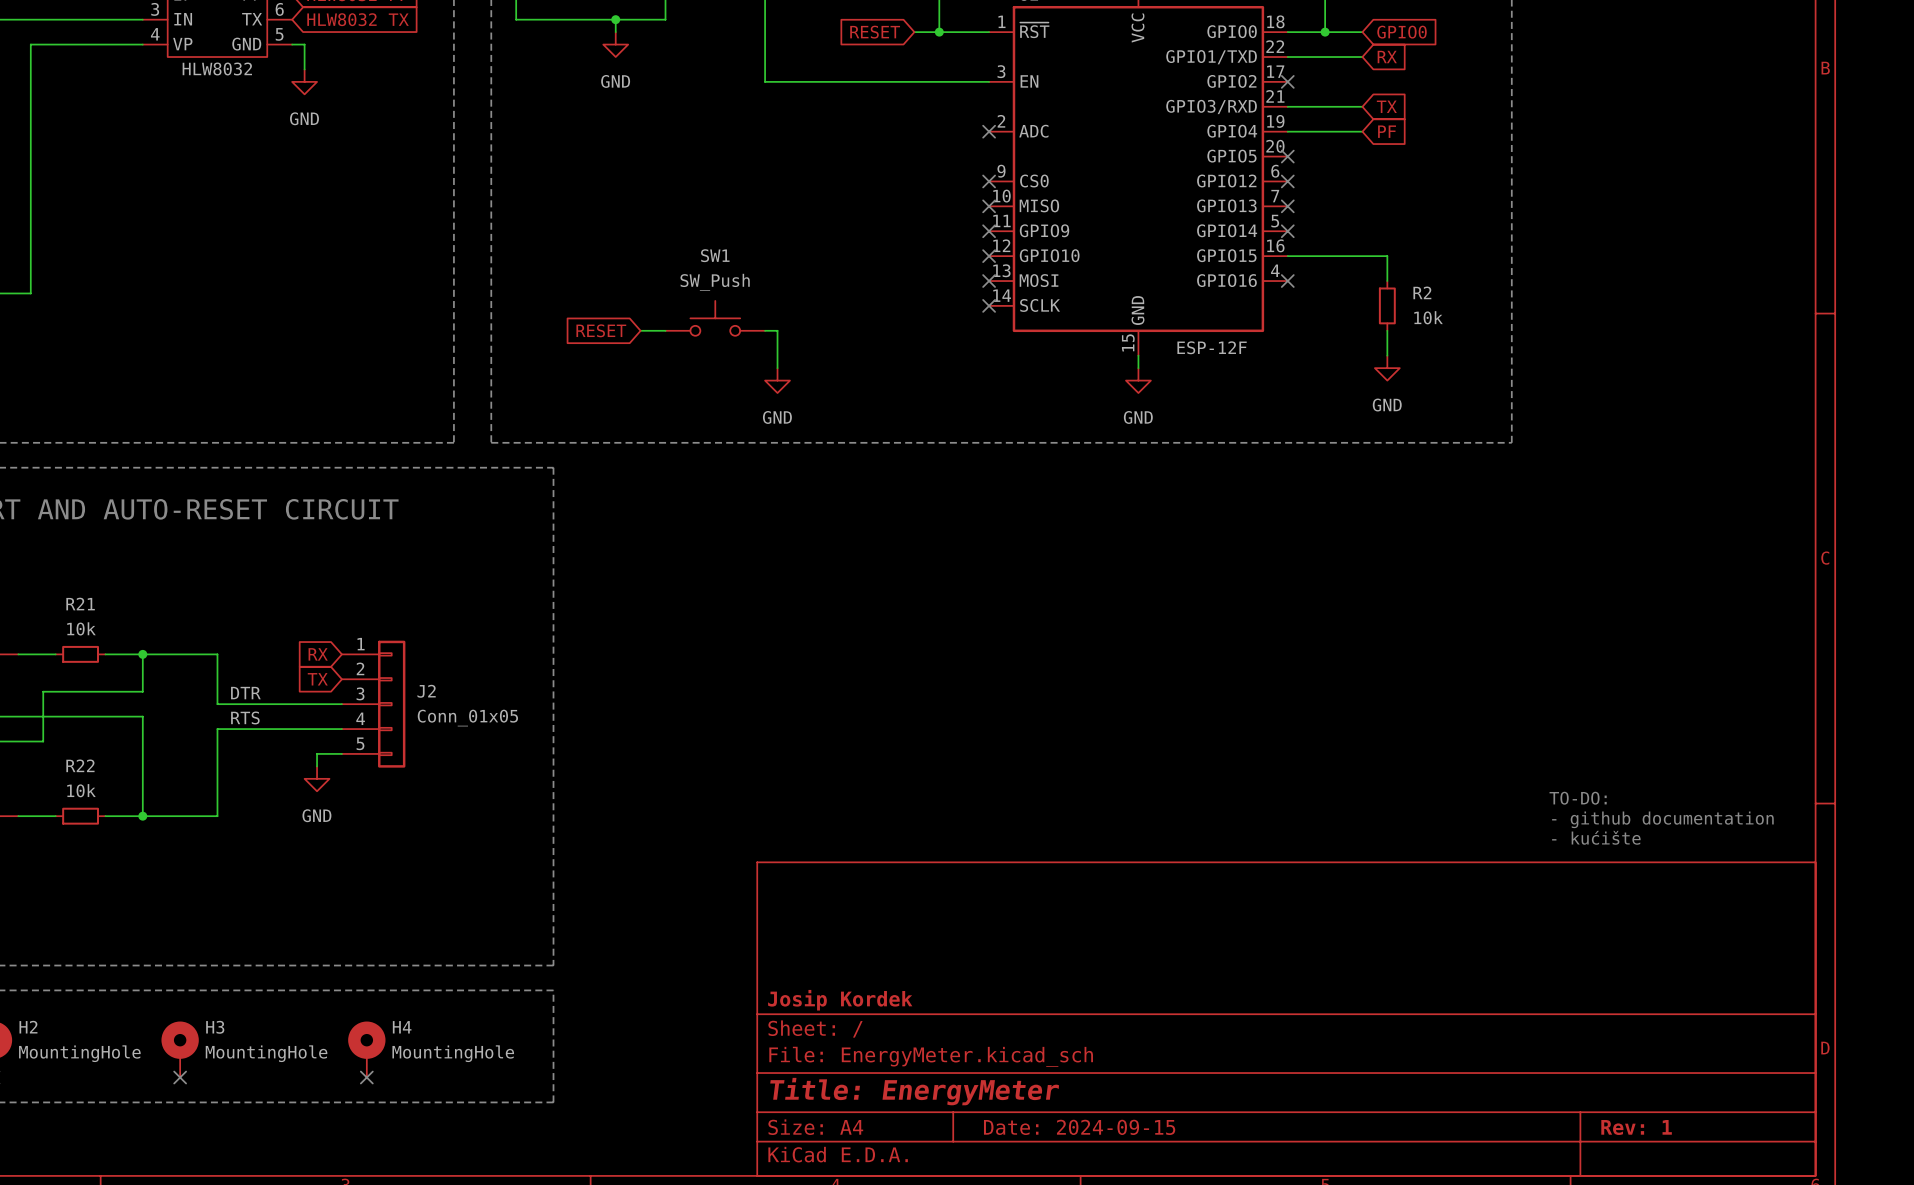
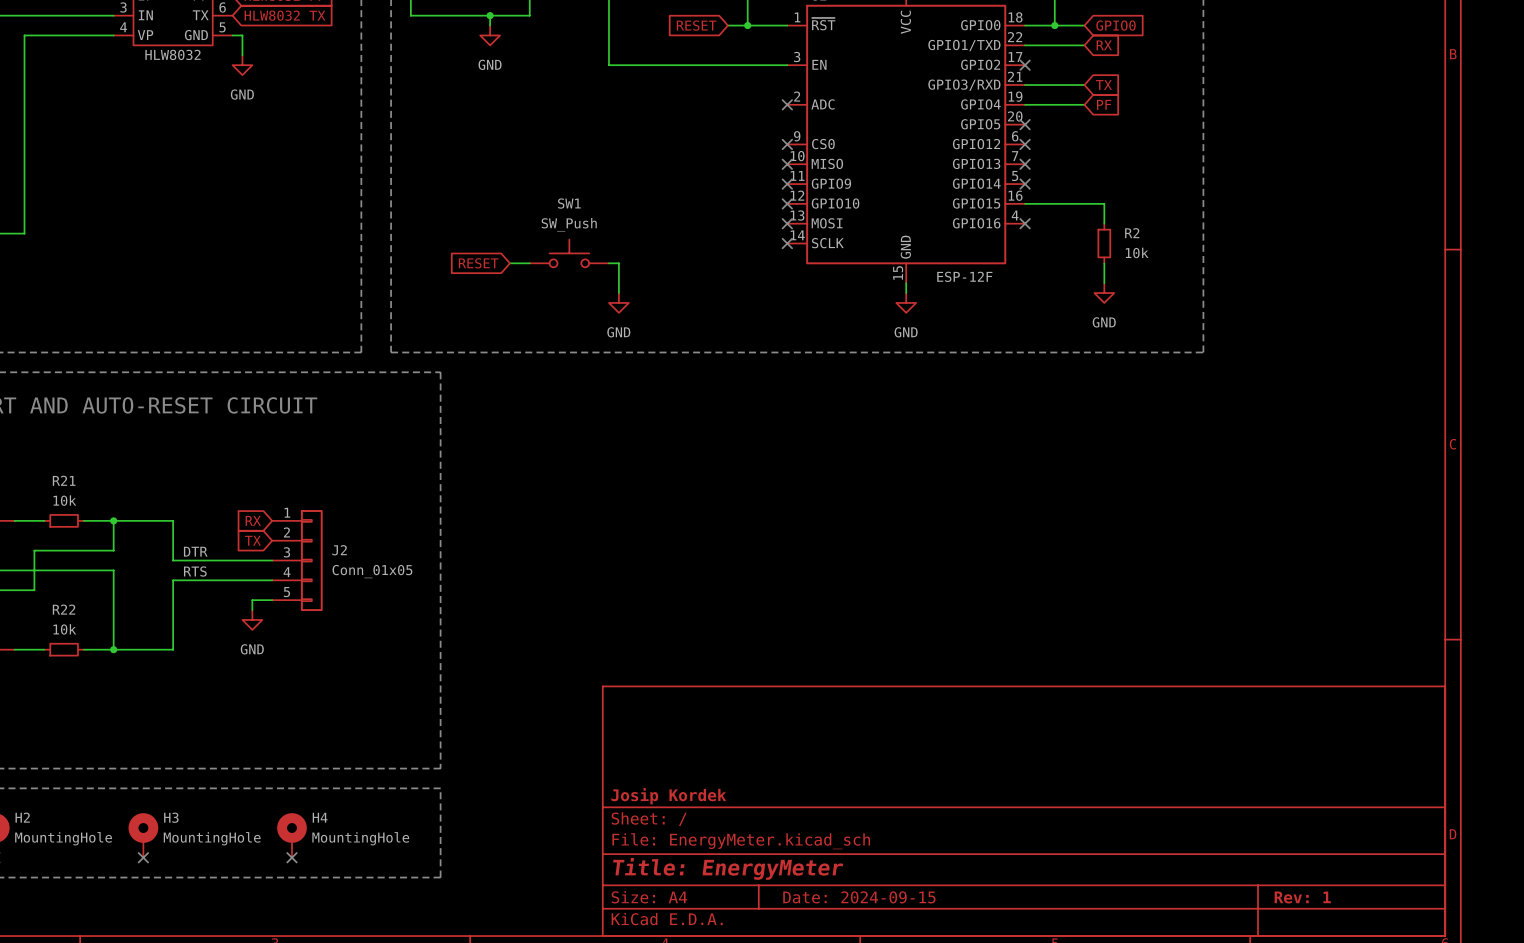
text: TO-DO: (1578, 798) -> none
text: - github documentation (1662, 819) -> none
text: - kućište (1596, 837) -> none

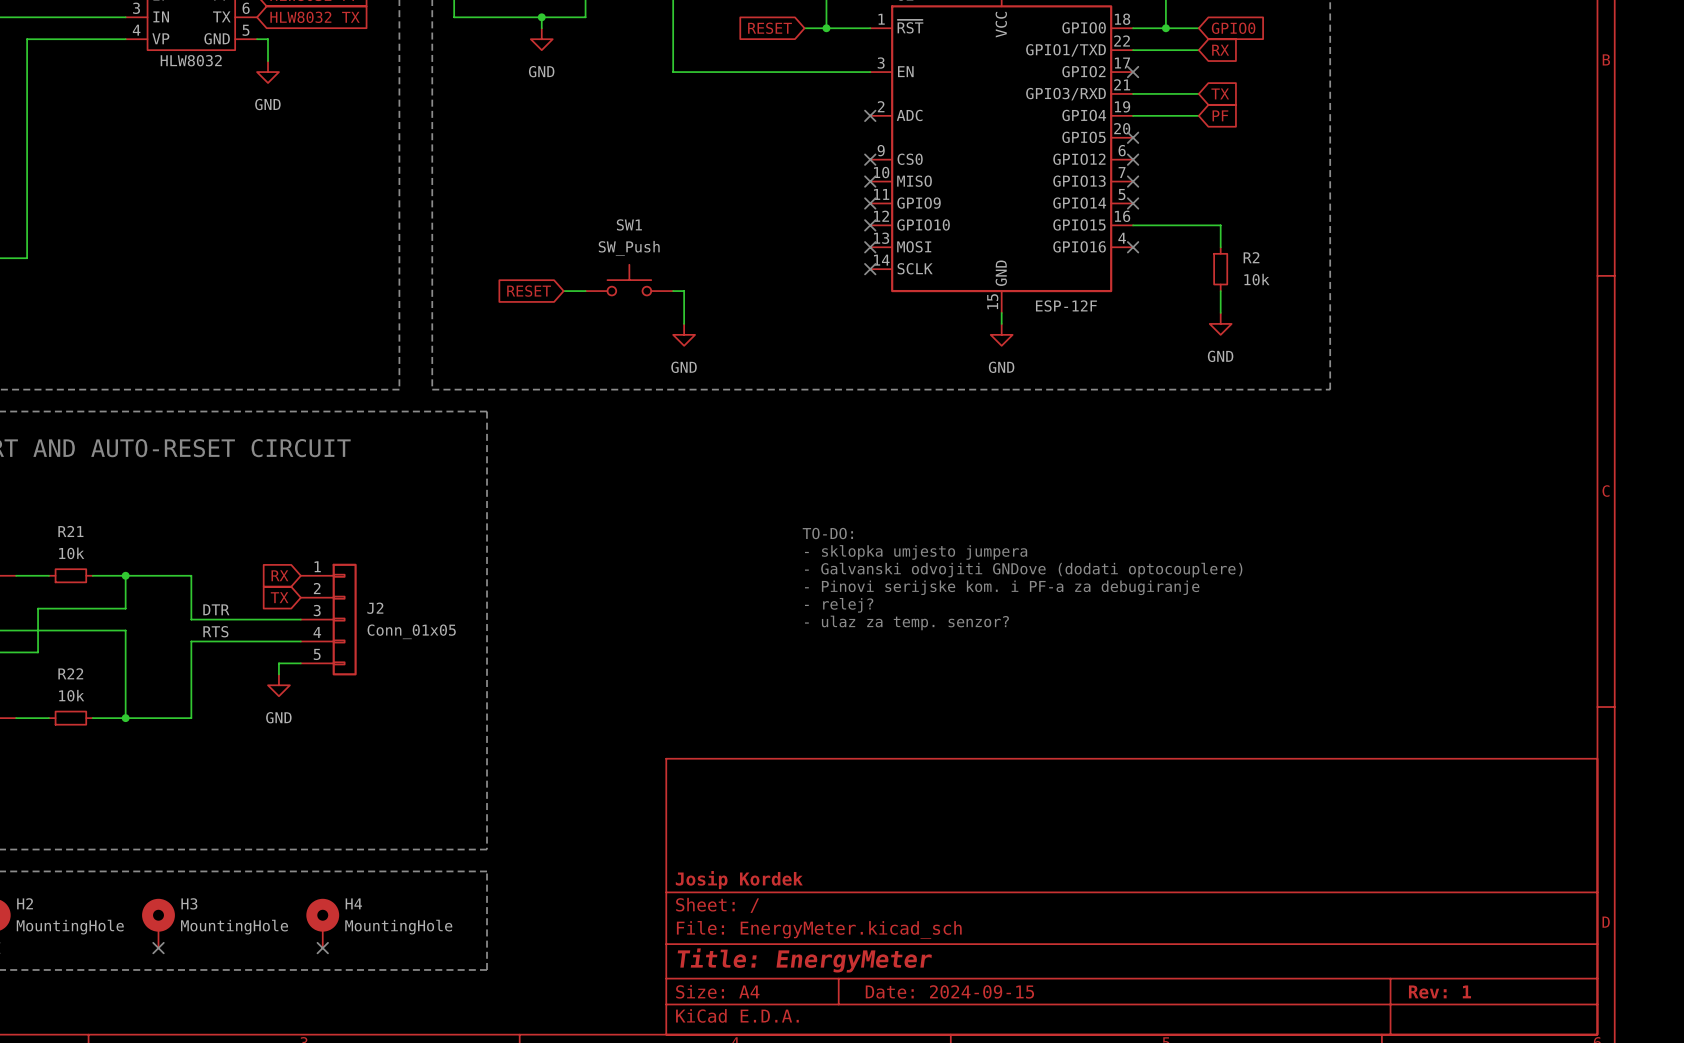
text: none -> TO-DO: (827, 533)
text: none -> - sklopka umjesto jumpera (916, 552)
text: none -> - Galvanski odvojiti GNDove (dodati optocouplere) (1023, 570)
text: none -> - Pinovi serijske kom. i PF-a za debugiranje (1002, 587)
text: none -> - relej? (839, 605)
text: none -> - ulaz za temp. senzor? (906, 622)

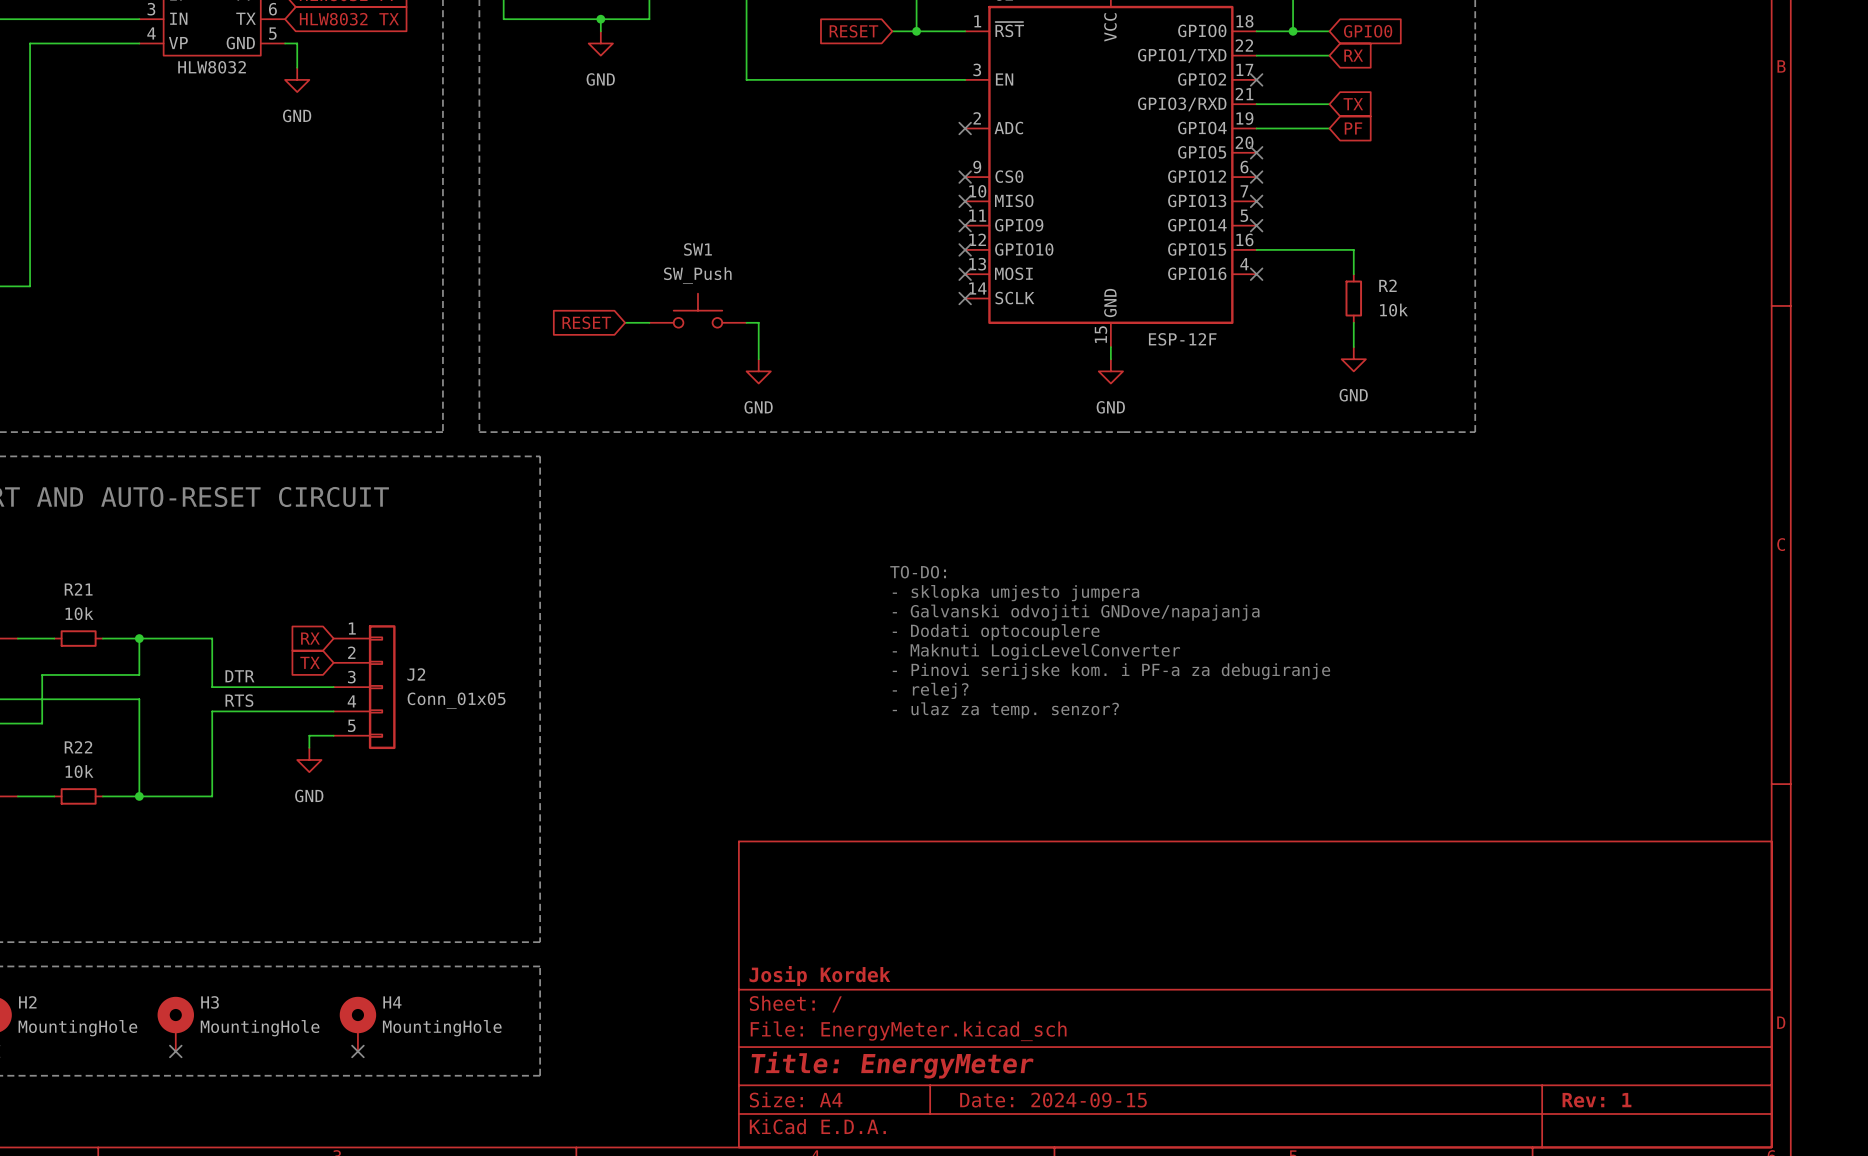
text: none -> TO-DO: (918, 572)
text: TO-DO: (827, 533) -> - sklopka umjesto jumpera (1015, 593)
text: - sklopka umjesto jumpera (916, 552) -> - Galvanski odvojiti GNDove/napajanja (1076, 612)
text: - Galvanski odvojiti GNDove (dodati optocouplere) (1023, 570) -> - Dodati optocouplere (996, 632)
text: - Pinovi serijske kom. i PF-a za debugiranje (1002, 587) -> - Maknuti LogicLevelConverter (1036, 651)
text: - relej? (839, 605) -> - Pinovi serijske kom. i PF-a za debugiranje (1111, 671)
text: - ulaz za temp. senzor? (906, 622) -> - relej? (930, 690)
text: none -> - ulaz za temp. senzor? (1005, 710)

